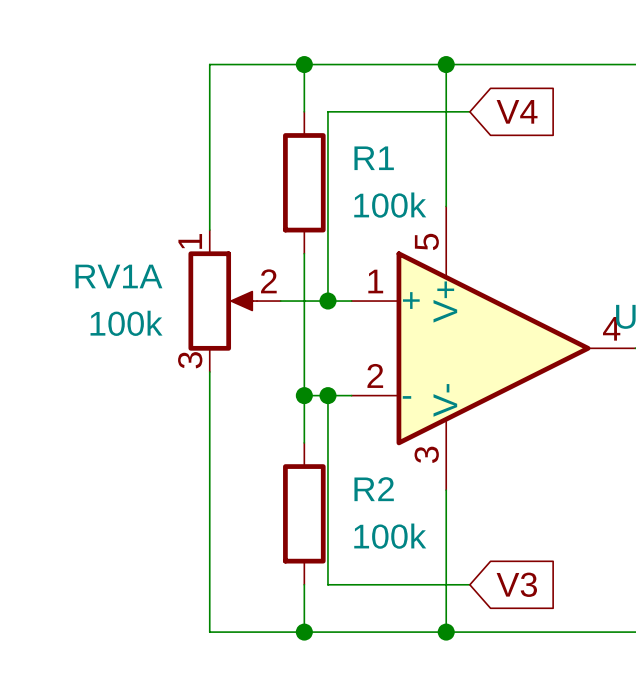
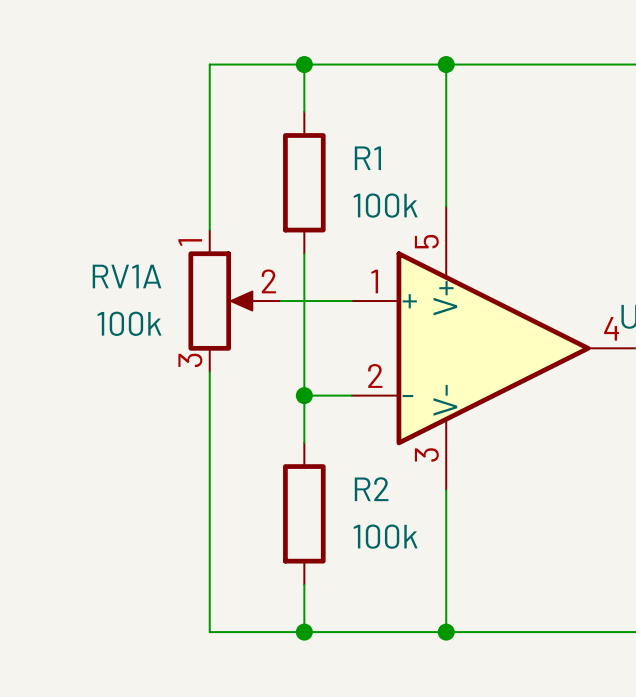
wire: (469, 111) (327, 111) (327, 301) -> none
global label: V4 (517, 111) -> none
junction: (327, 301) -> none
wire: (327, 395) (327, 584) (469, 584) -> none
junction: (327, 395) -> none
global label: V3 (516, 584) -> none

